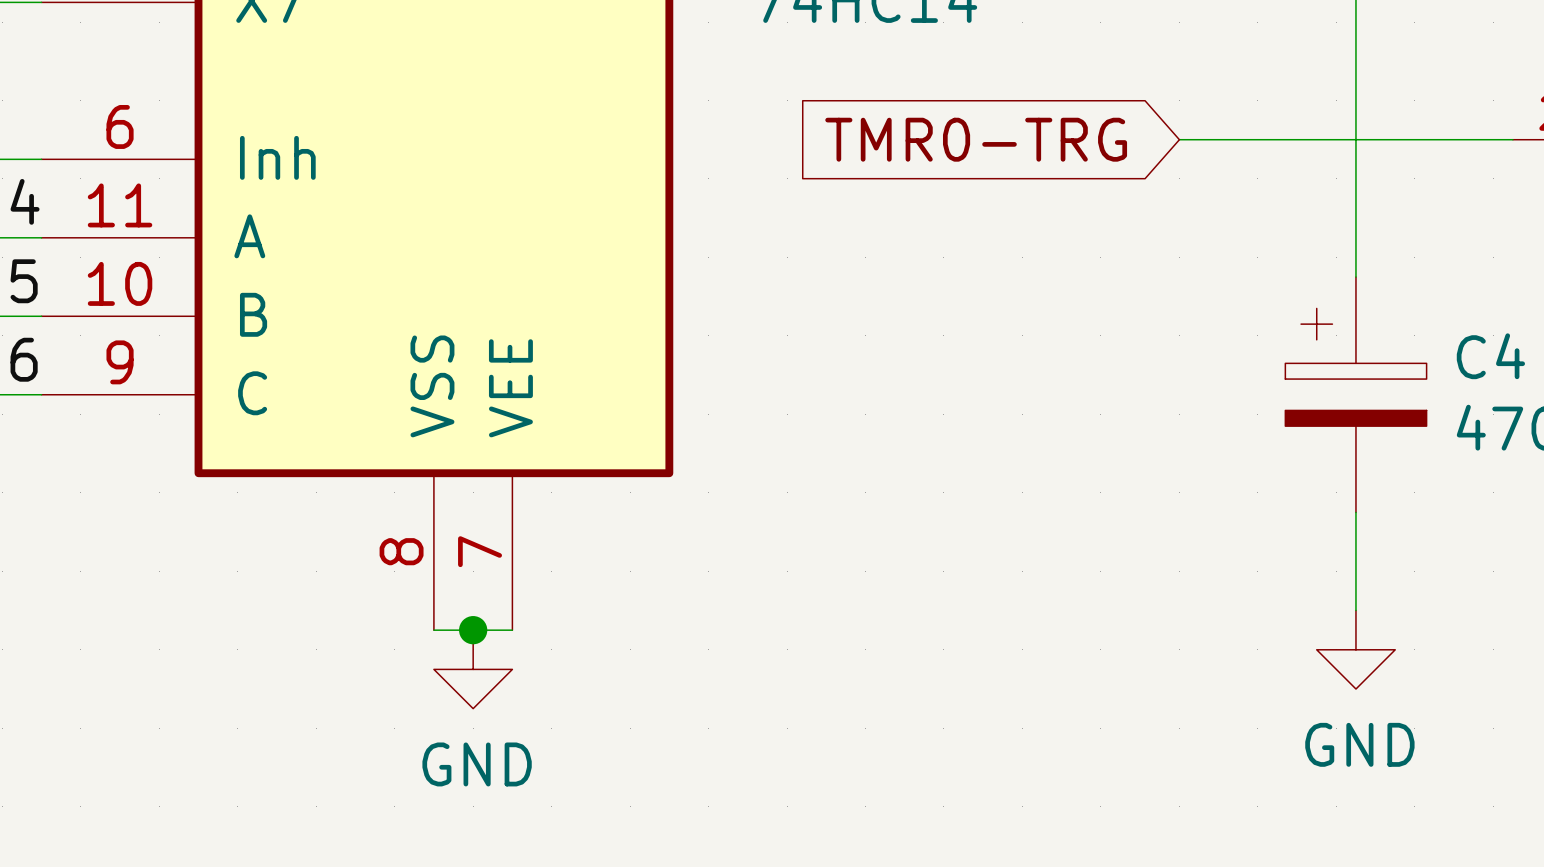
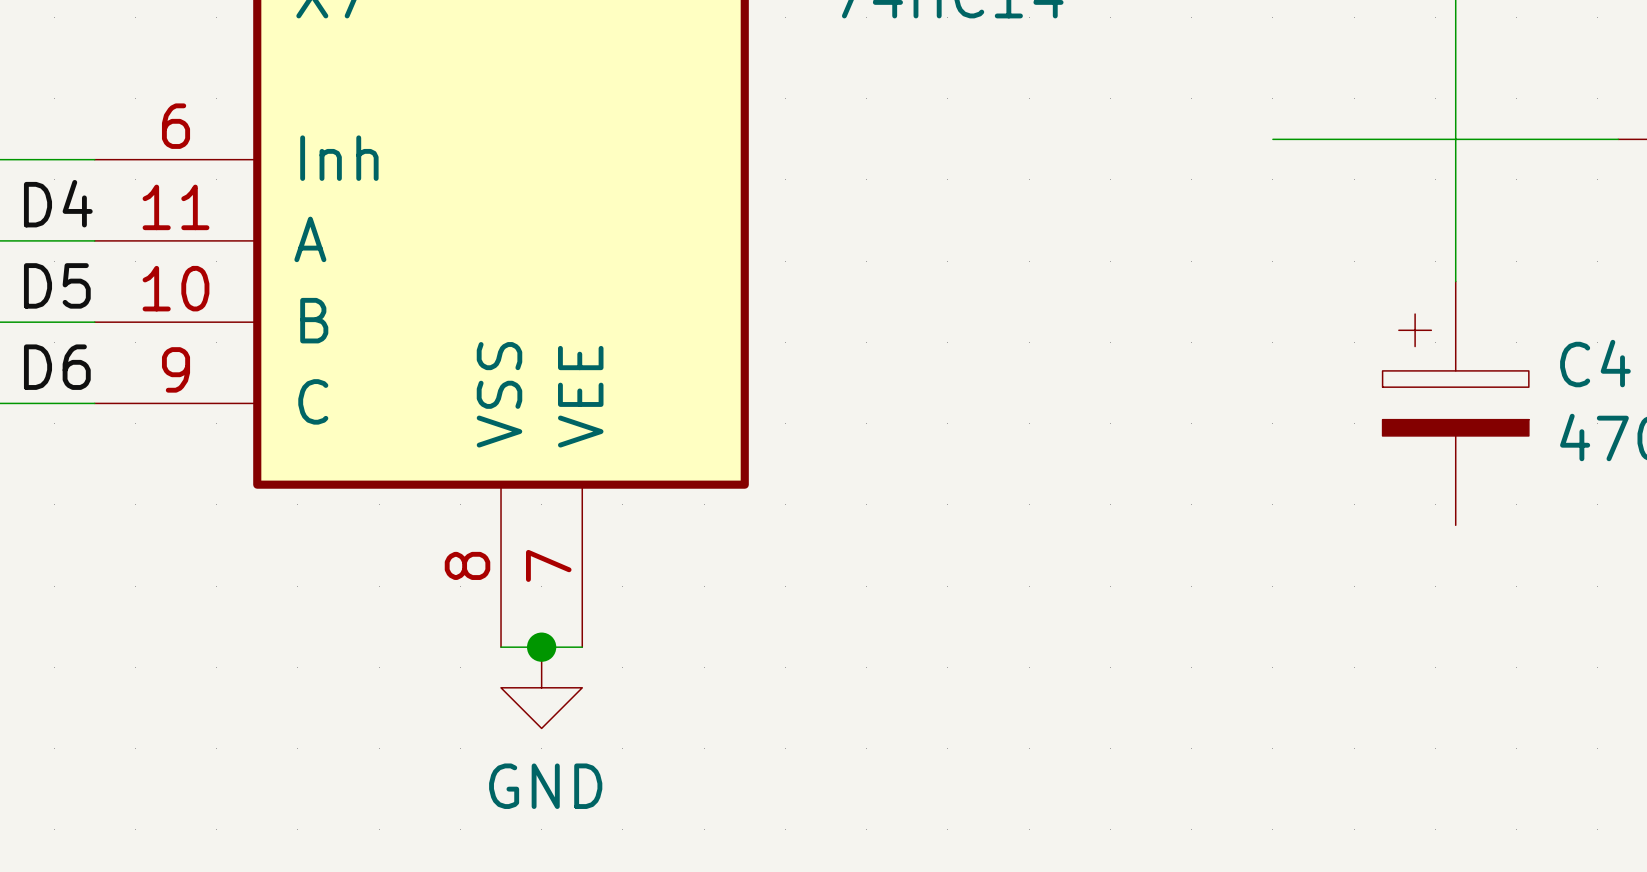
global label: TMR0-TRG (976, 139) -> none
wire: (1355, 512) (1355, 610) -> none
power symbol: GND (1355, 649) -> none

